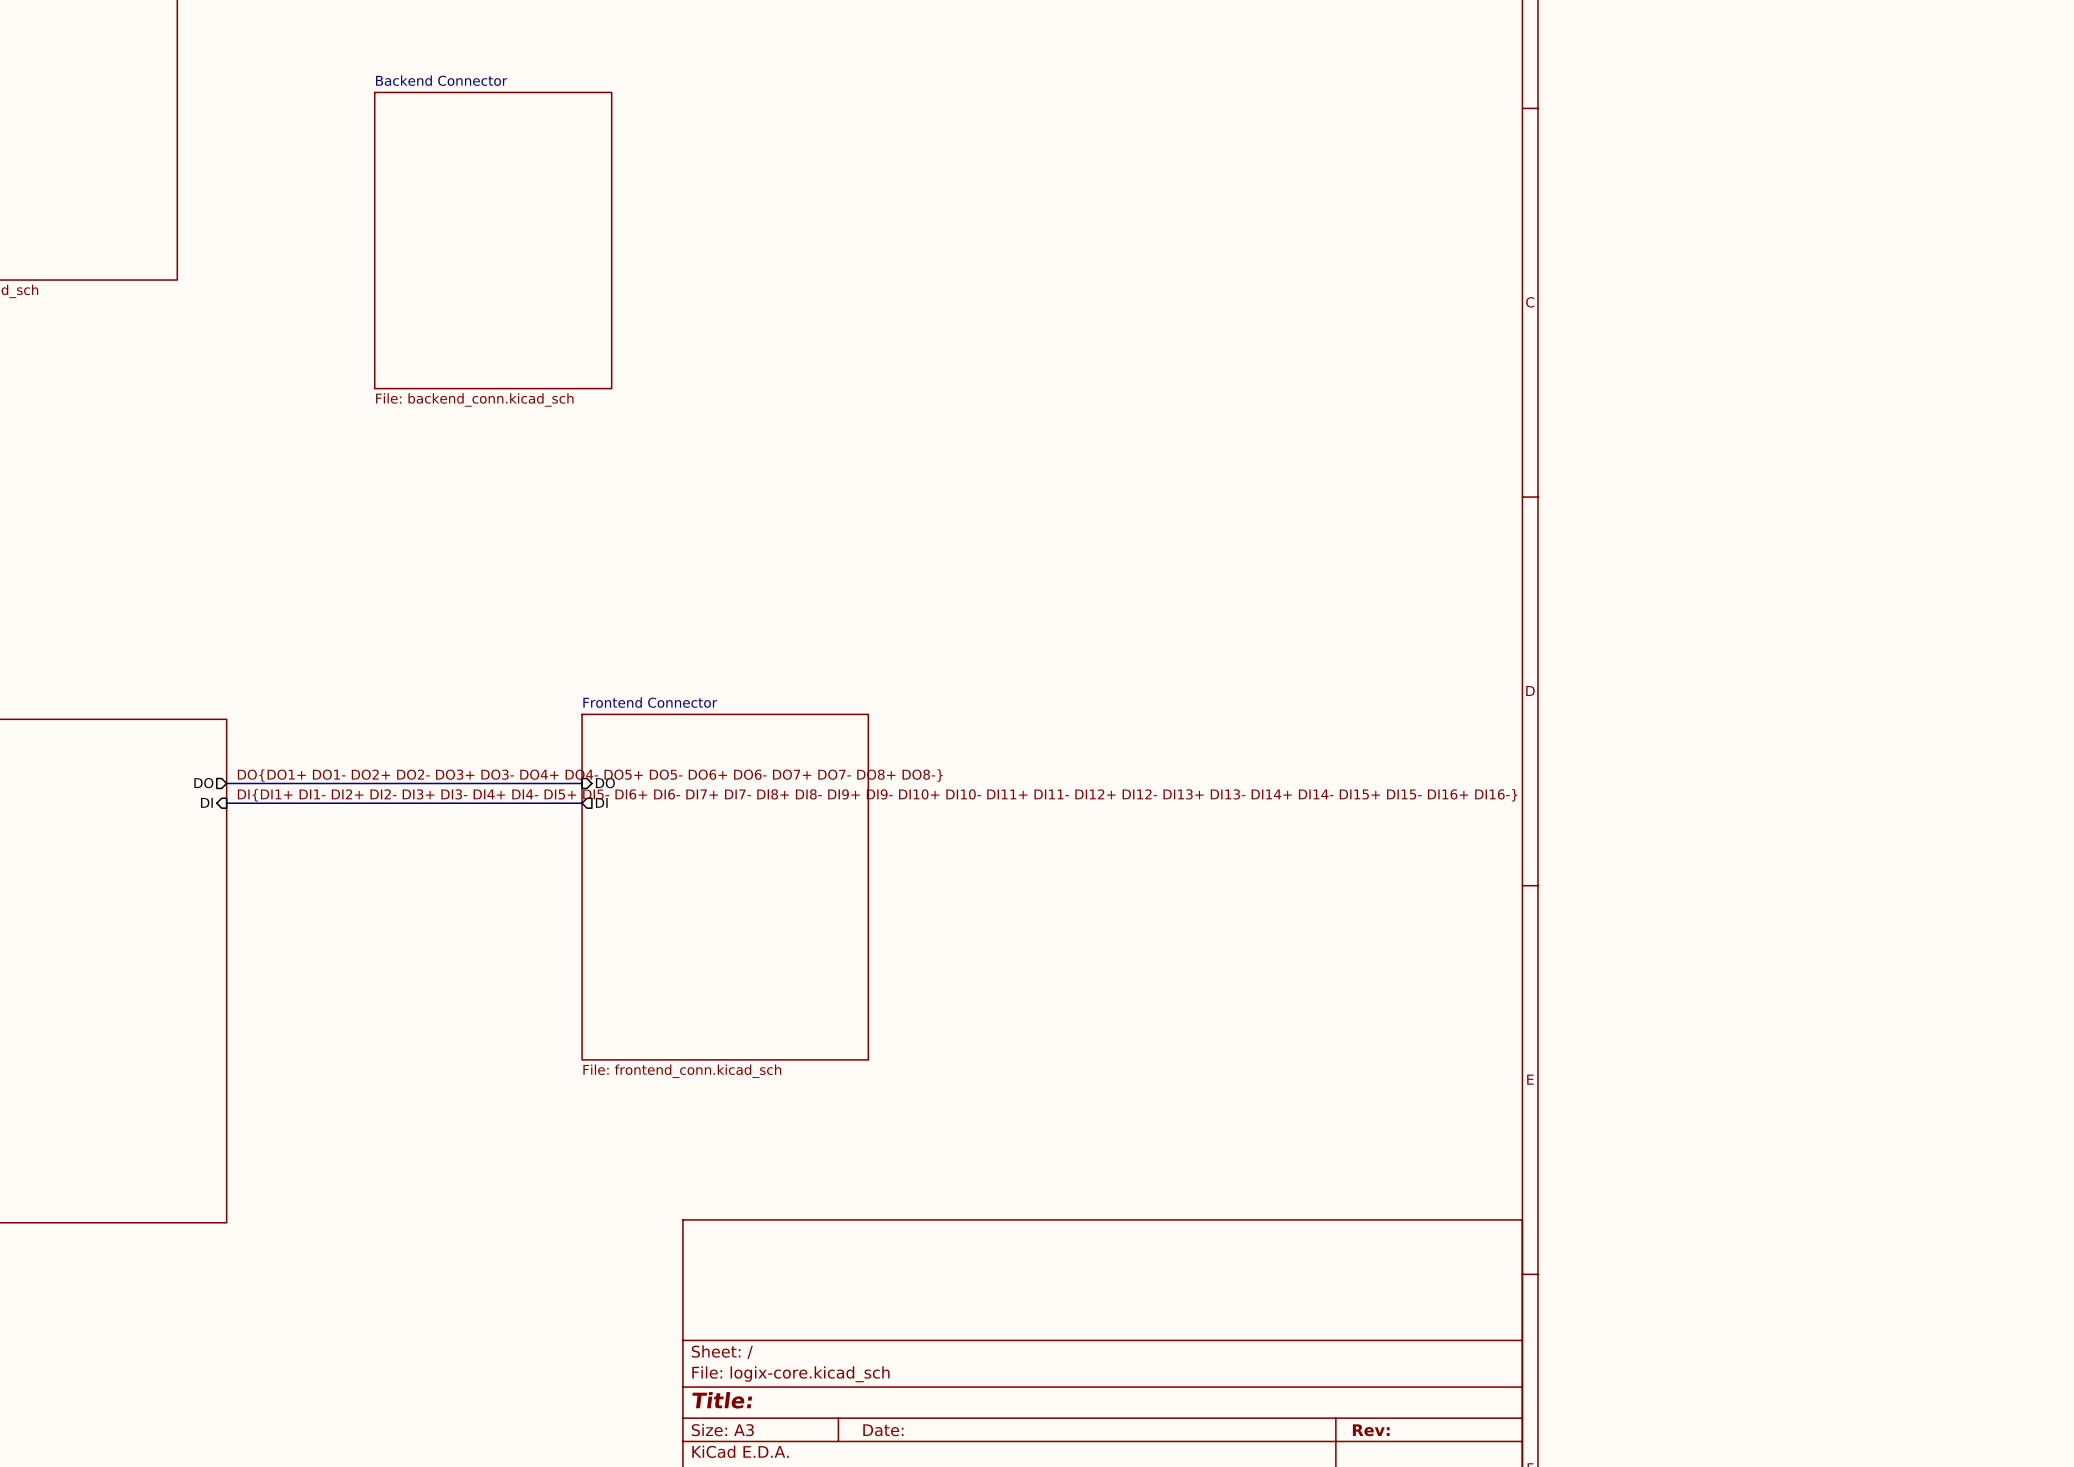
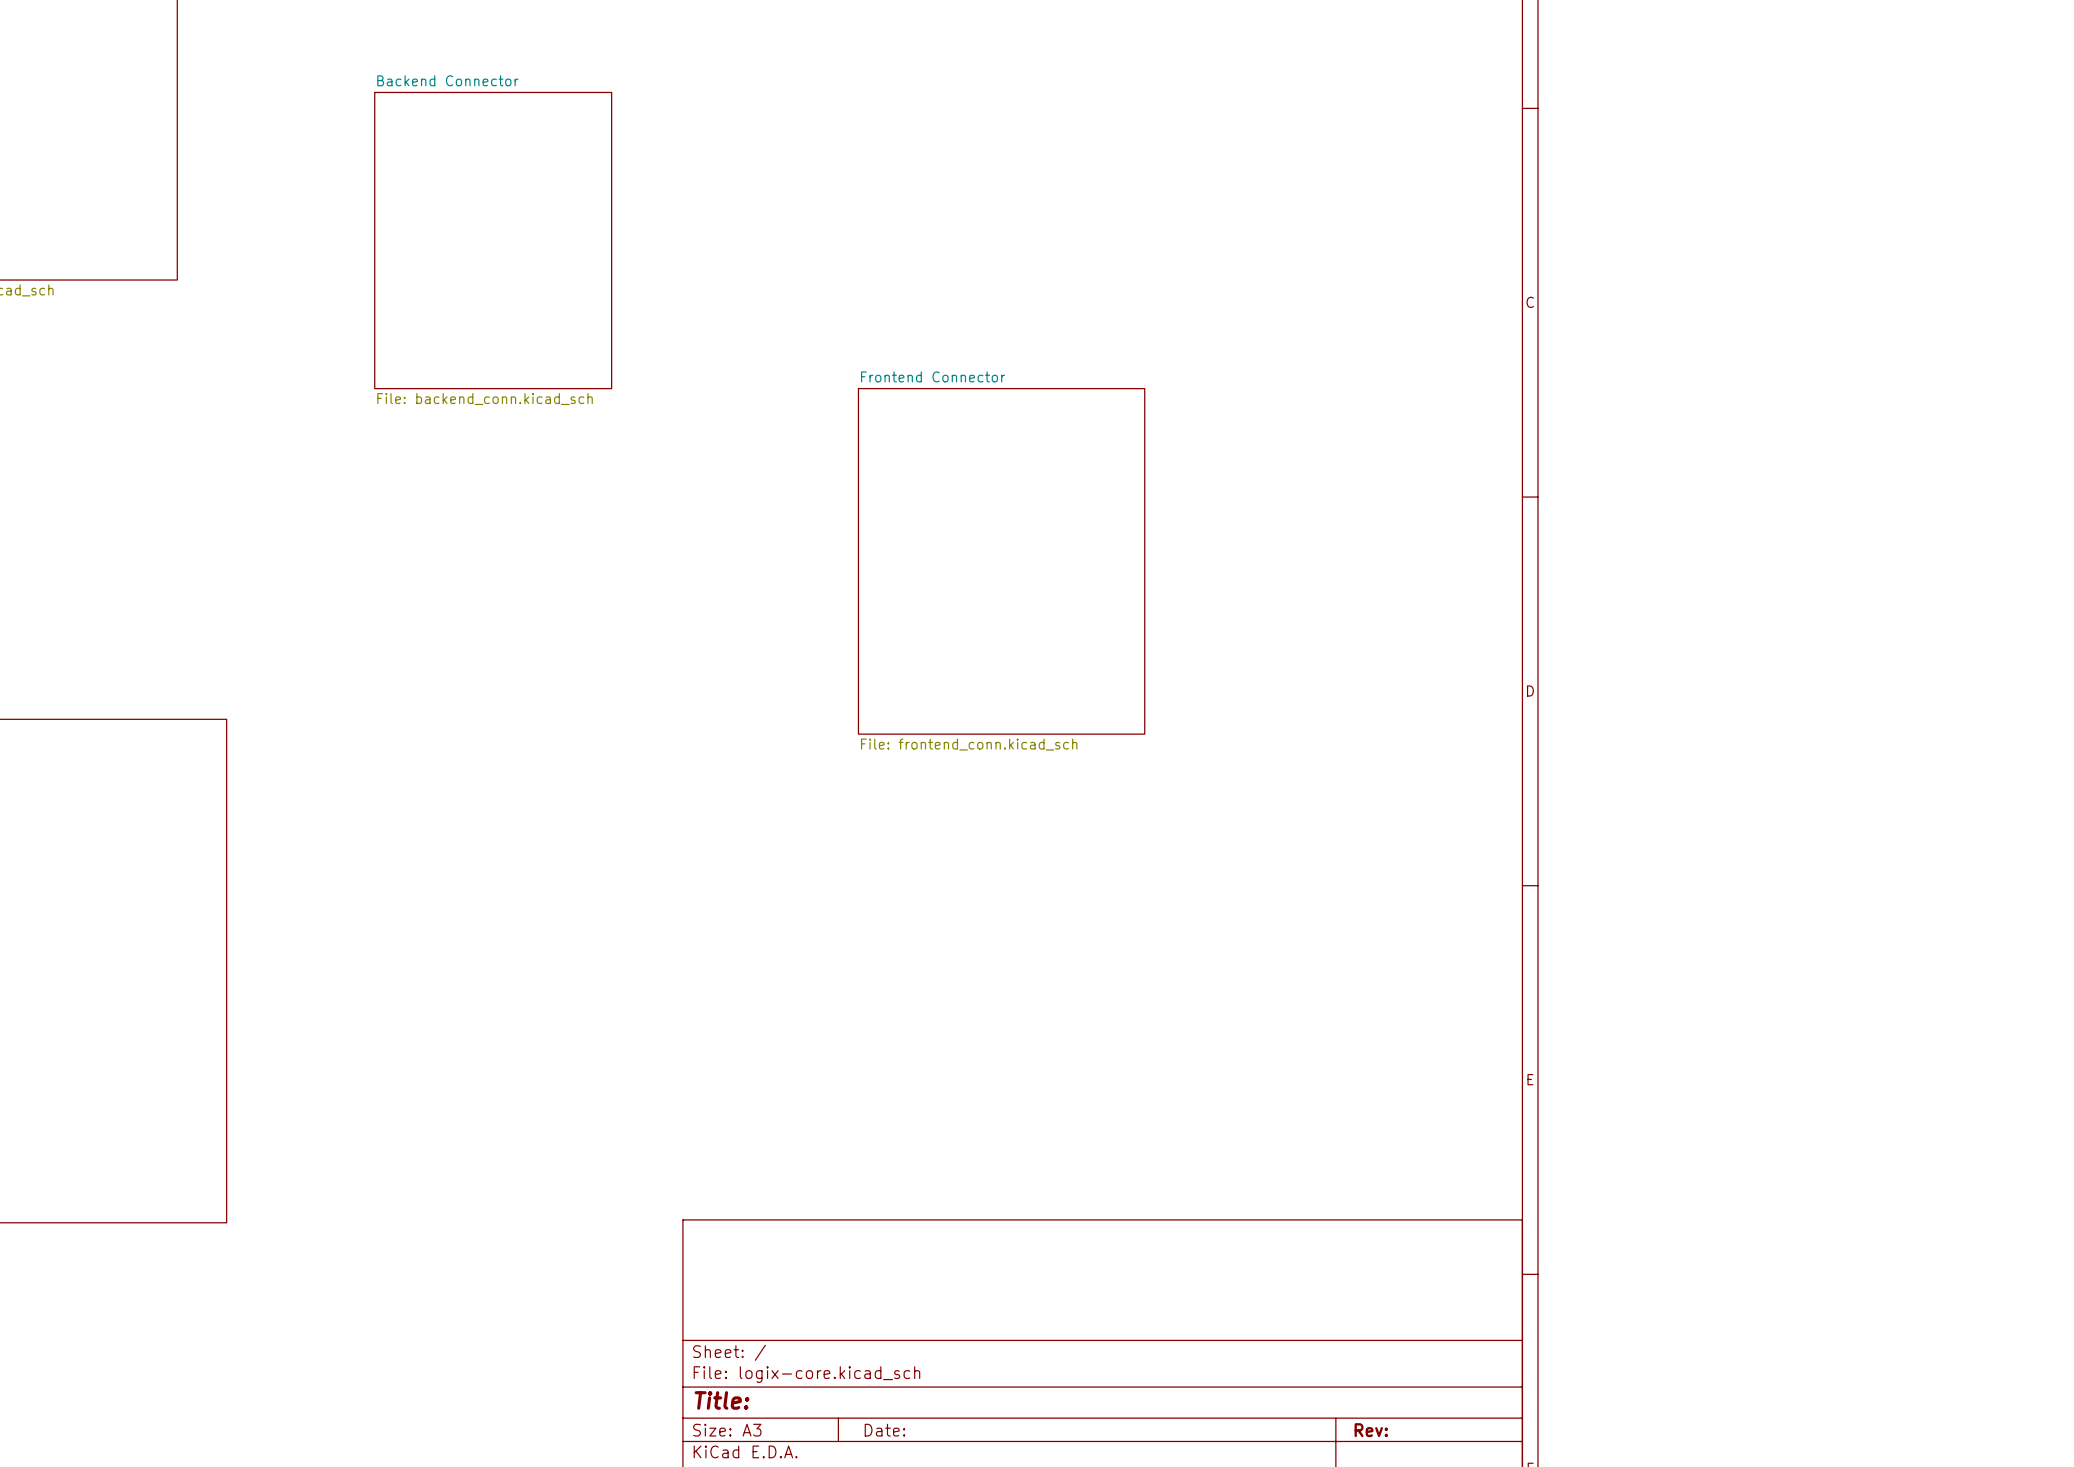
sheet Frontend Connector: none -> File: frontend_conn.kicad_sch (1001, 561)
label: DO{DO1+ DO1- DO2+ DO2- DO3+ DO3- DO4+ DO4- DO5+ DO5- DO6+ DO6- DO7+ DO7- DO8+ DO8-} (590, 775) -> none
sheet pin: DO (203, 783) -> none
bus: (226, 783) (582, 783) -> none
sheet pin: DO (605, 783) -> none
label: DI{DI1+ DI1- DI2+ DI2- DI3+ DI3- DI4+ DI4- DI5+ DI5- DI6+ DI6- DI7+ DI7- DI8+ DI8- DI9+ DI9- DI10+ DI10- DI11+ DI11- DI12+ DI12- DI13+ DI13- DI14+ DI14- DI15+ DI15- DI16+ DI16-} (877, 795) -> none
sheet pin: DI (206, 802) -> none
sheet pin: DI (601, 802) -> none
bus: (226, 803) (582, 803) -> none
sheet Frontend Connector: File: frontend_conn.kicad_sch (725, 887) -> none

